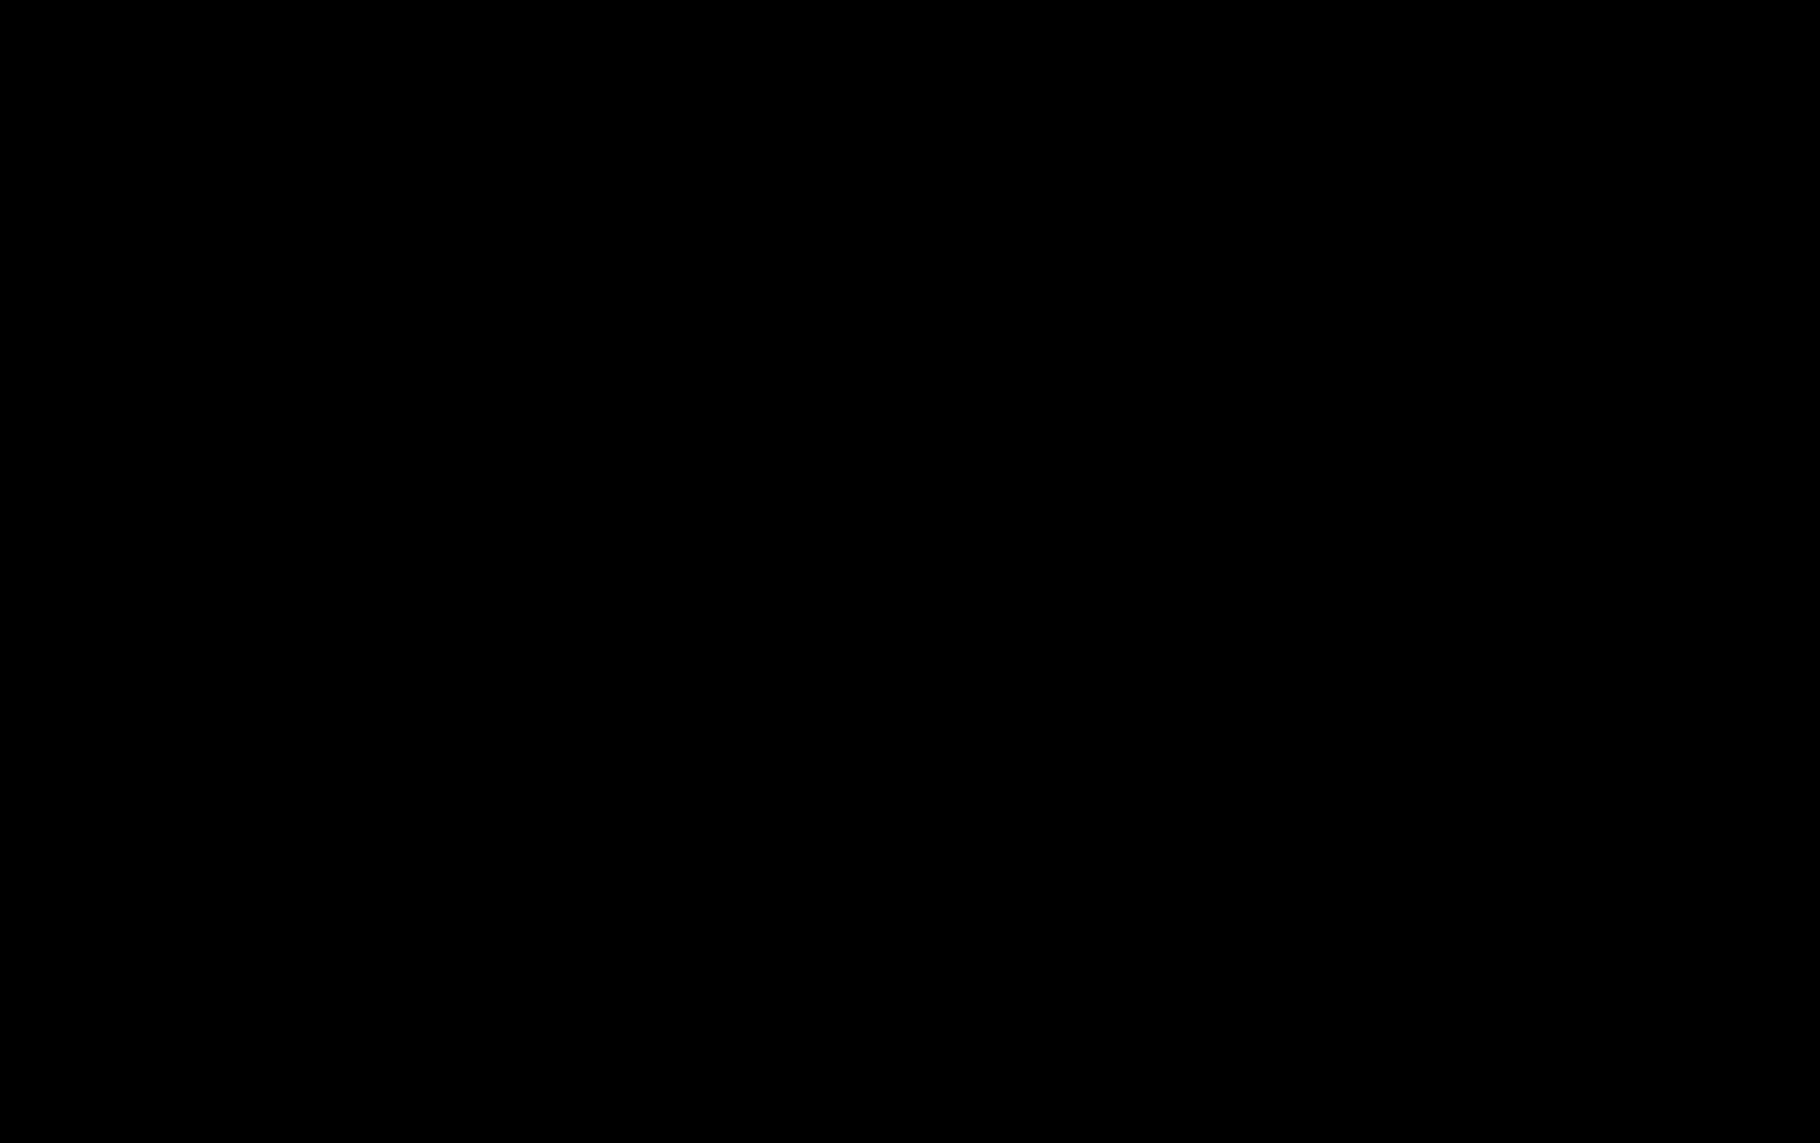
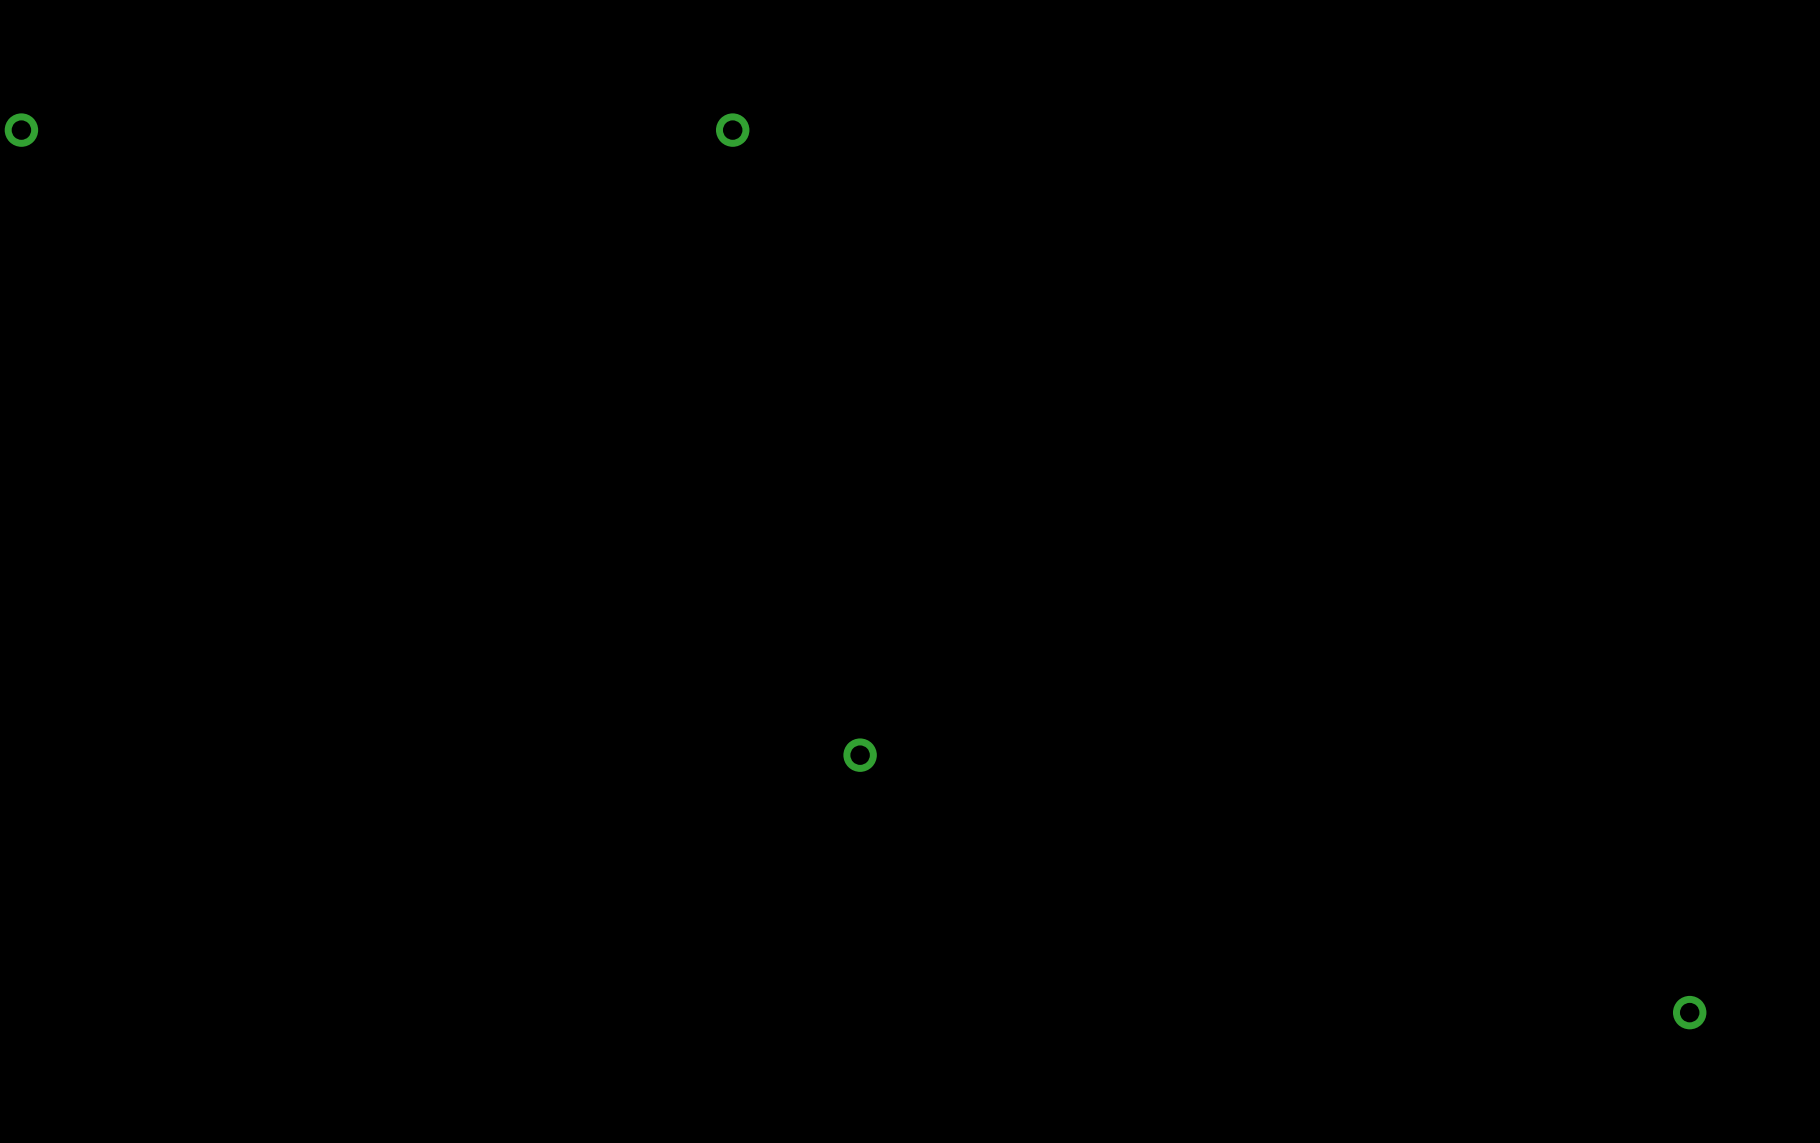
part: none -> (21, 130)
part: none -> (732, 130)
part: none -> (860, 755)
part: none -> (1689, 1012)

